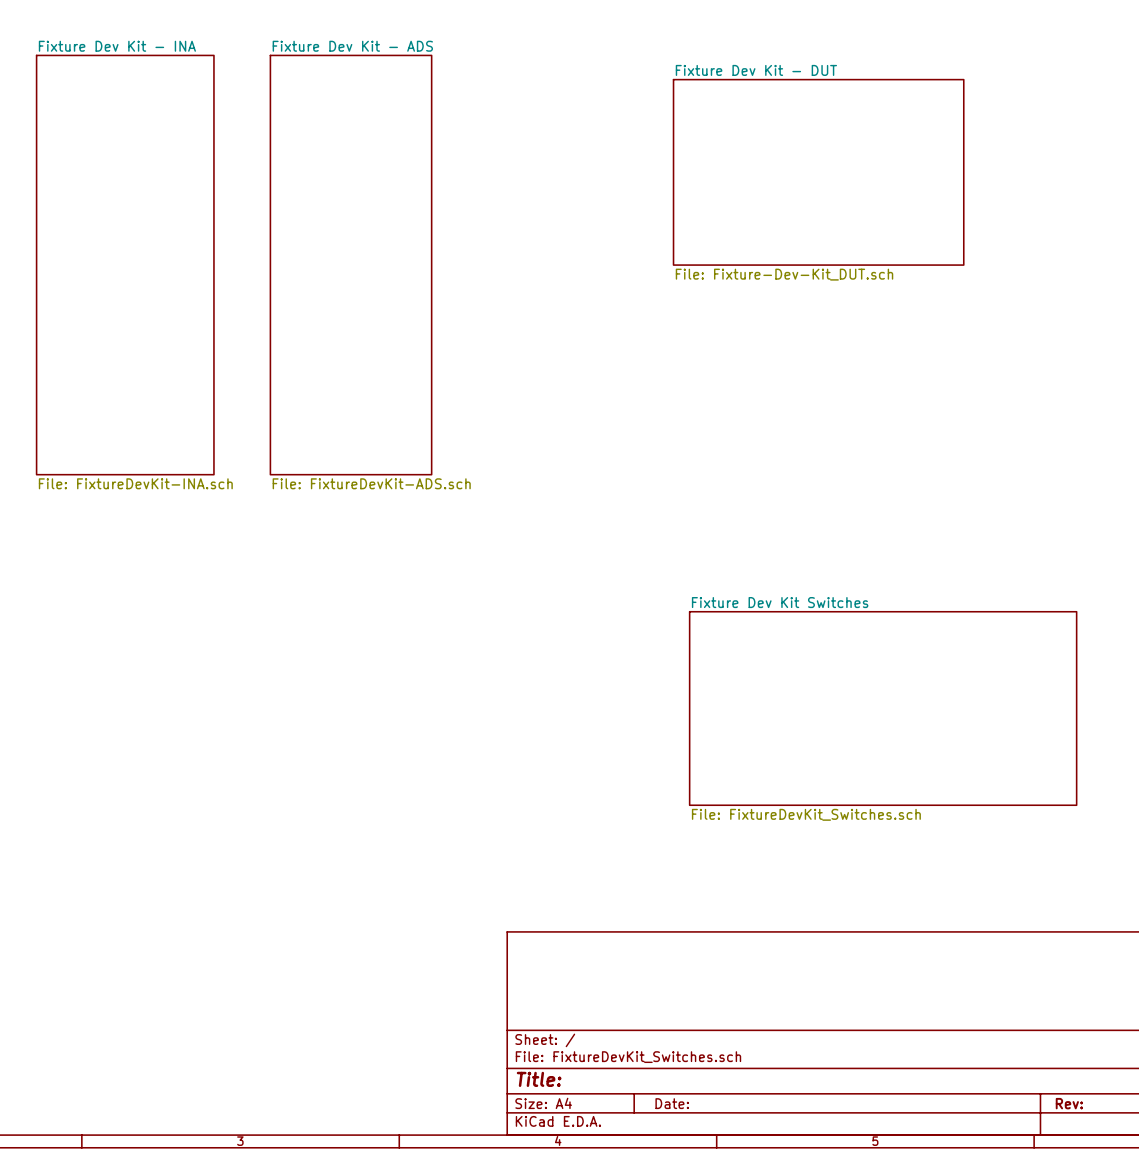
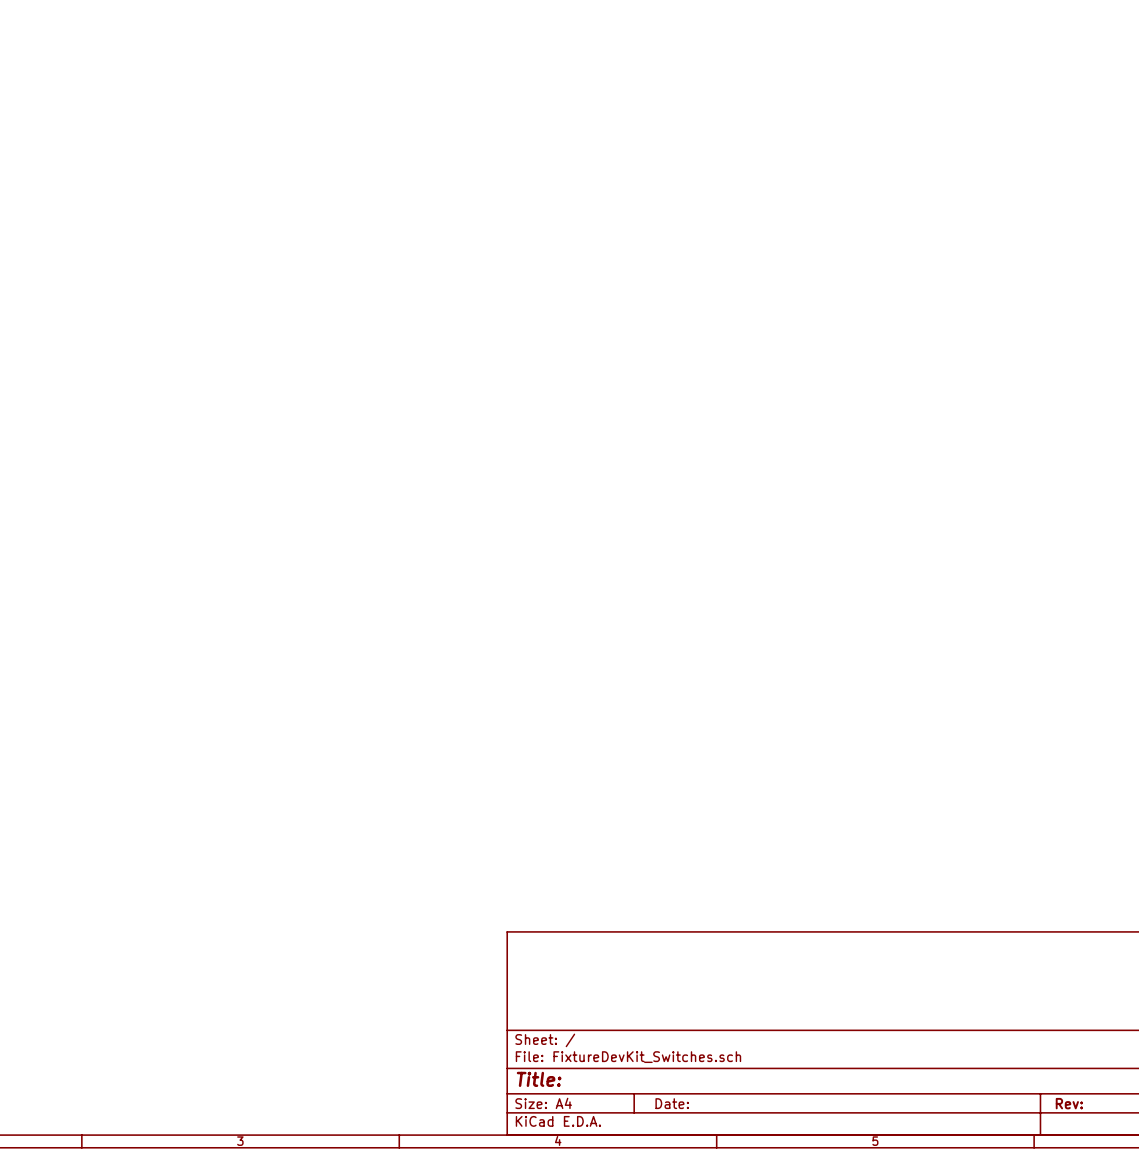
sheet Fixture Dev Kit - DUT: File: Fixture-Dev-Kit_DUT.sch (818, 172) -> none
sheet Fixture Dev Kit - INA: File: FixtureDevKit-INA.sch (125, 265) -> none
sheet Fixture Dev Kit - ADS: File: FixtureDevKit-ADS.sch (351, 265) -> none
sheet Fixture Dev Kit Switches: File: FixtureDevKit_Switches.sch (883, 708) -> none

